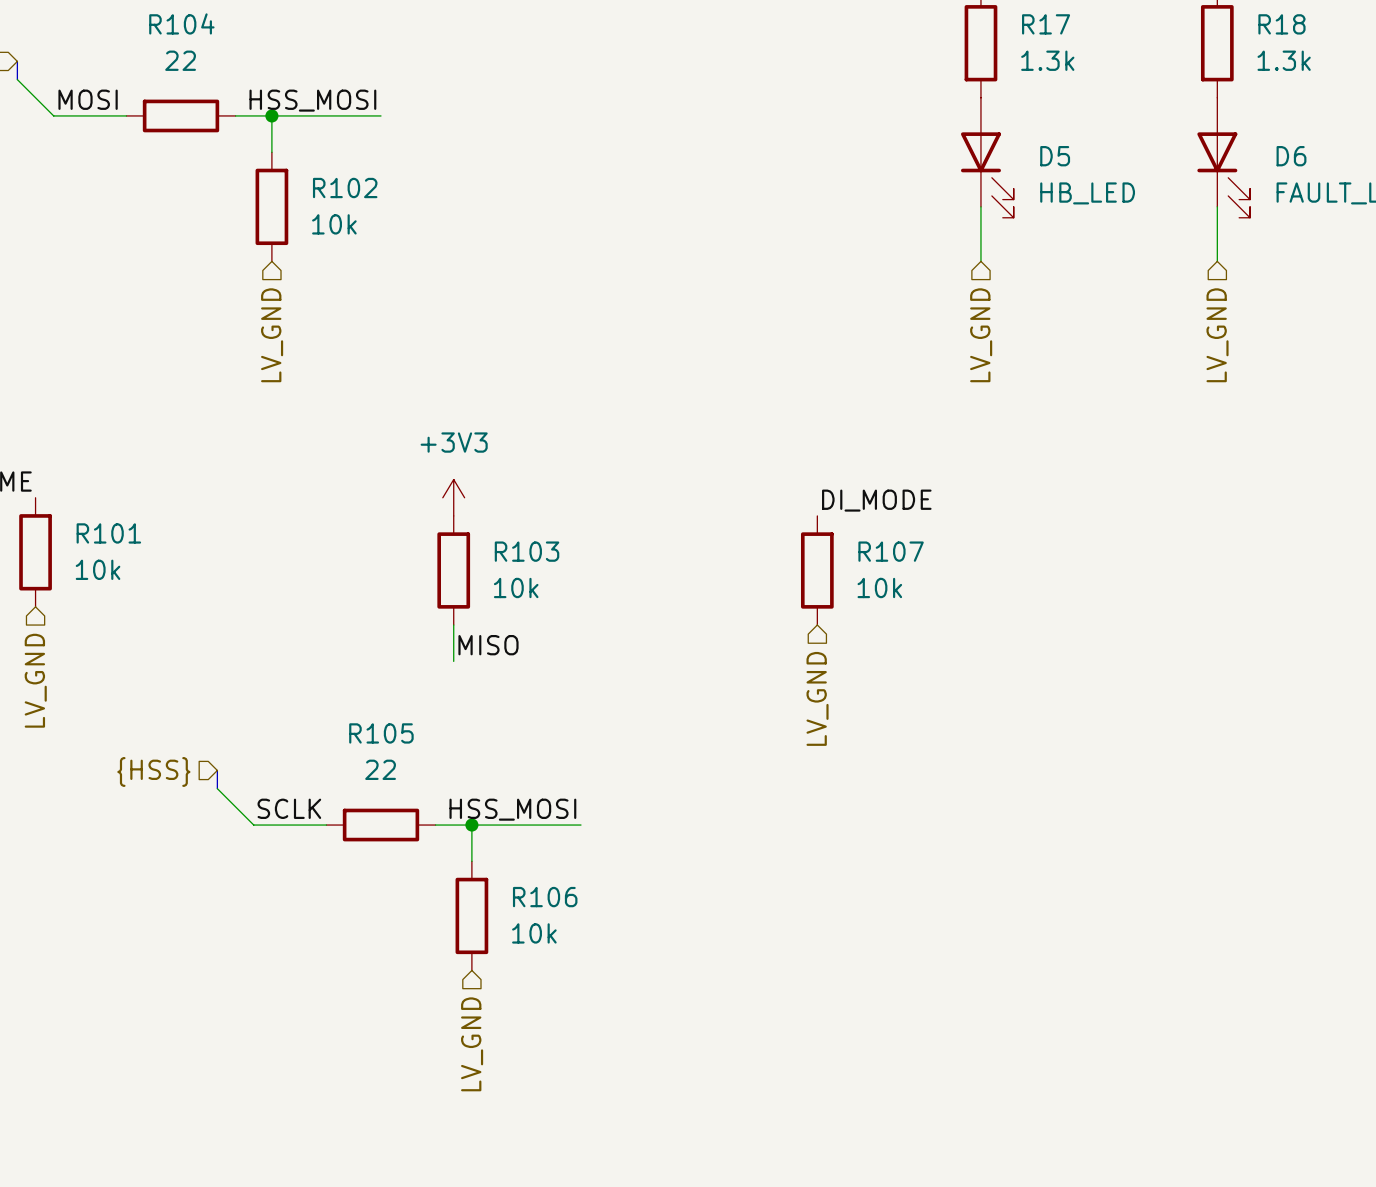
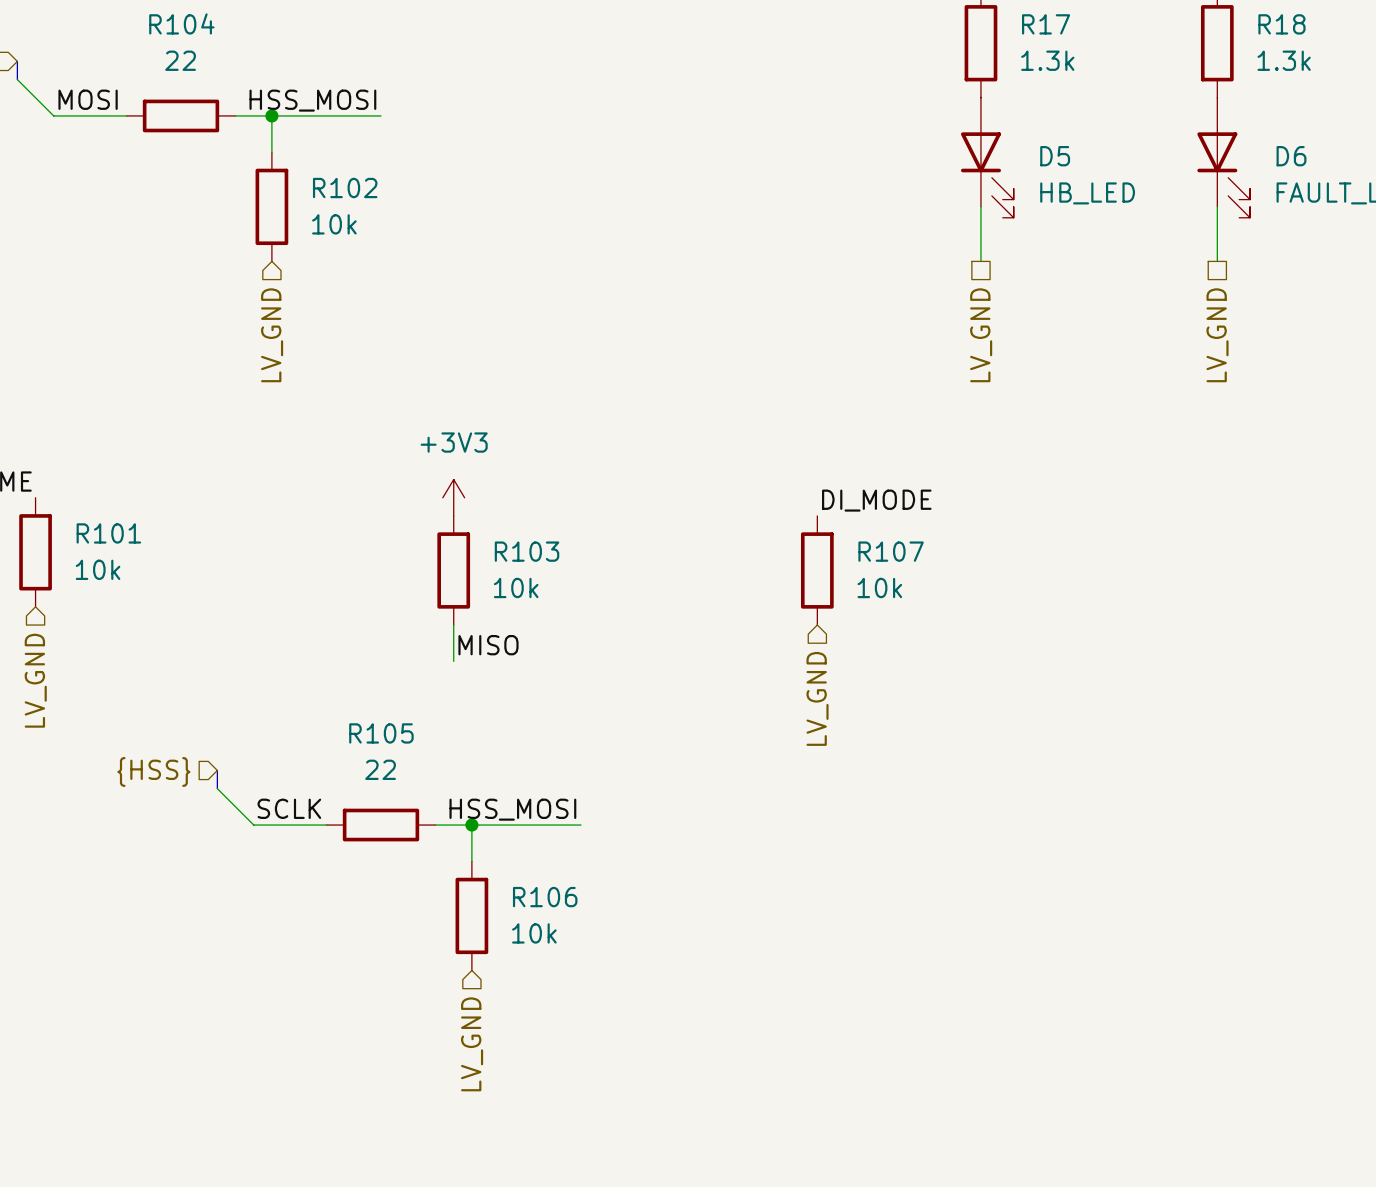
hierarchical label shape: input (981, 335) -> passive (981, 335)
hierarchical label shape: input (1217, 335) -> passive (1217, 335)

